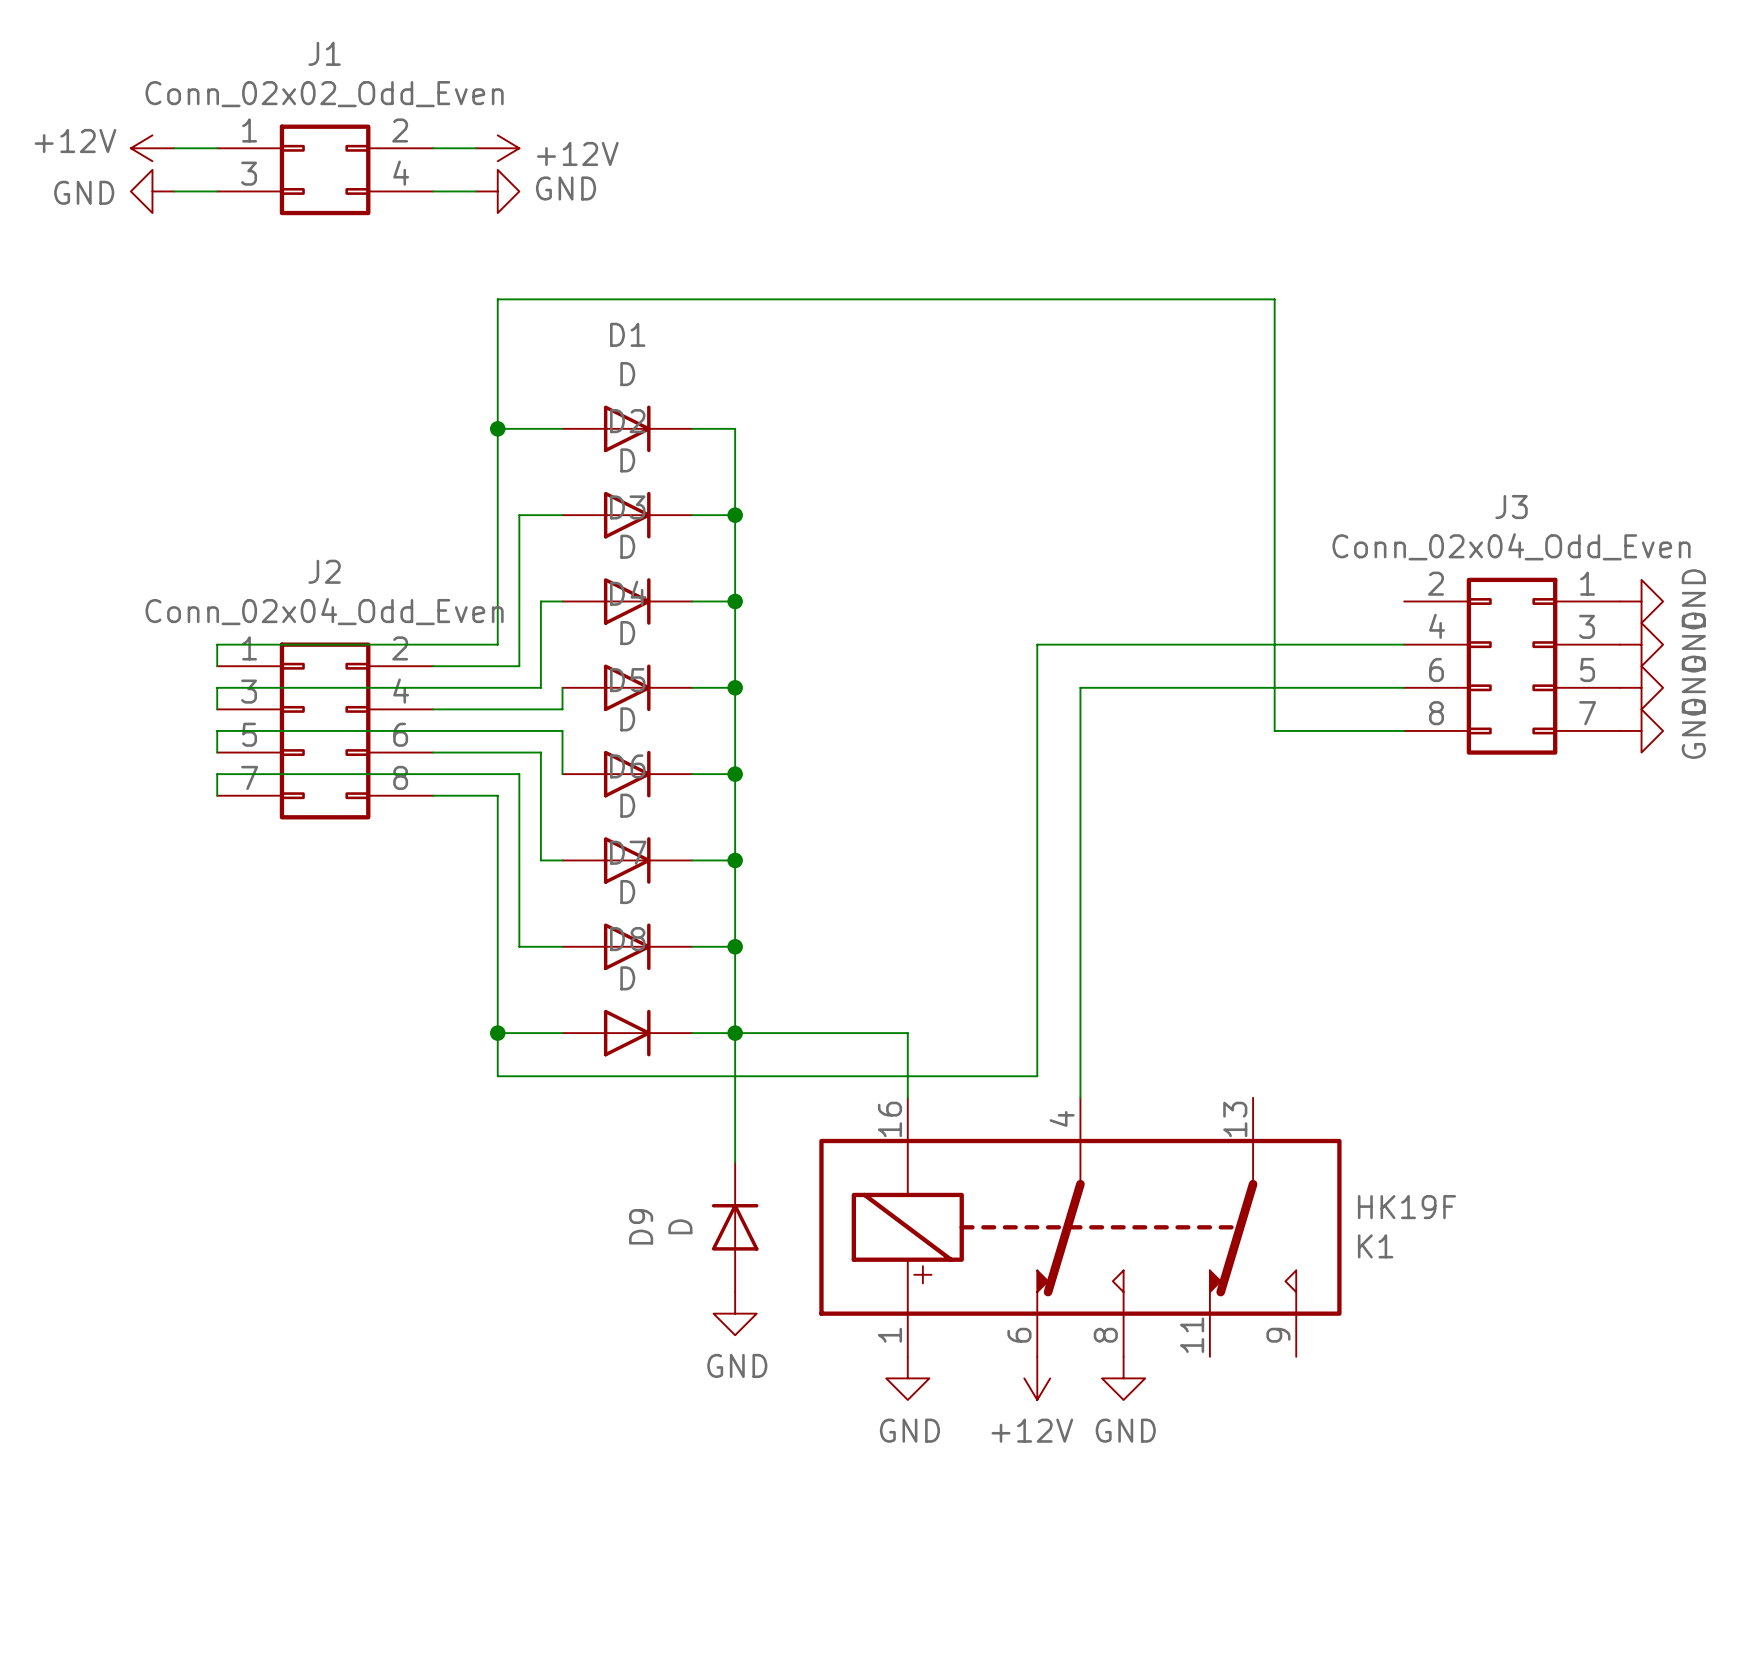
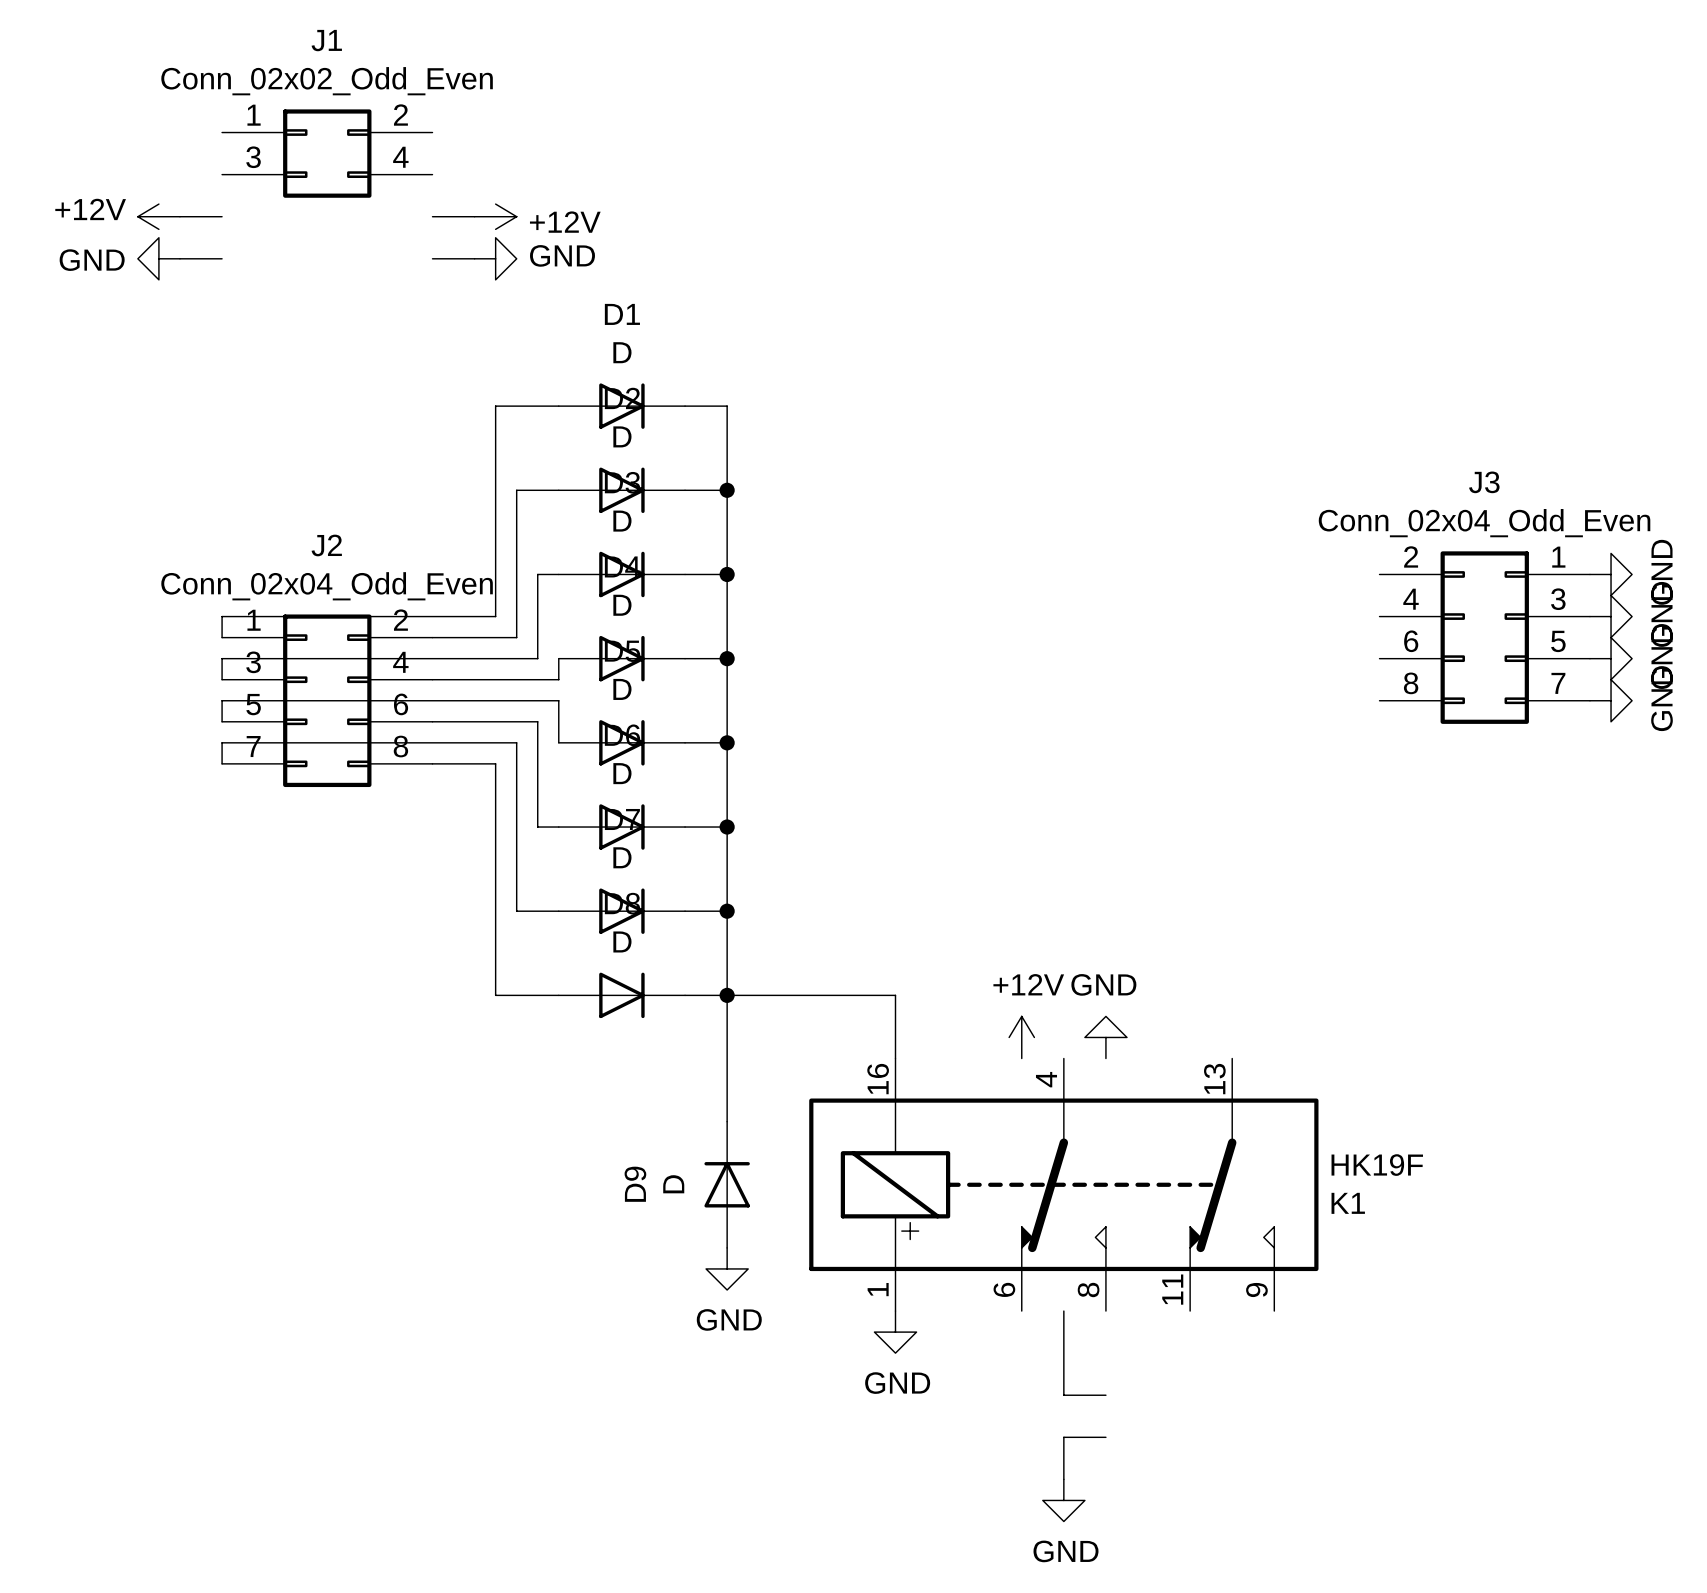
power symbol position: +12V (152, 148) -> +12V (158, 216)
wire: (174, 148) (217, 148) -> (179, 216) (222, 216)
wire: (433, 148) (476, 148) -> (432, 216) (474, 216)
power symbol position: +12V (497, 148) -> +12V (495, 216)
power symbol position: GND (152, 191) -> GND (158, 258)
wire: (174, 191) (217, 191) -> (179, 258) (222, 258)
wire: (433, 191) (476, 191) -> (432, 258) (474, 258)
power symbol position: GND (497, 191) -> GND (495, 258)
wire: (497, 428) (497, 299) (1274, 299) (1274, 730) (1404, 730) -> none
junction: (497, 428) -> none
wire: (1404, 644) (1037, 644) (1037, 1076) (497, 1076) (497, 1033) -> none
wire: (1404, 687) (1080, 687) (1080, 1097) -> none
junction: (497, 1033) -> none
power symbol: none -> GND (1105, 1037)
wire: none -> (1063, 1311) (1063, 1395) (1105, 1395)
power symbol rotation: 0° (1037, 1378) -> 180° (1021, 1037)
power symbol position: +12V (1037, 1378) -> +12V (1021, 1037)
power symbol: GND (1123, 1378) -> none
wire: none -> (1105, 1437) (1063, 1437) (1063, 1479)
power symbol: none -> GND (1063, 1500)

